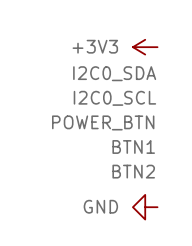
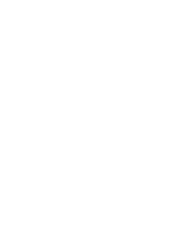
power symbol: +3V3 (145, 47) -> none
label: I2C0_SDA (114, 73) -> none
label: I2C0_SCL (114, 98) -> none
label: POWER_BTN (103, 122) -> none
label: BTN1 (133, 146) -> none
label: BTN2 (133, 171) -> none
power symbol: GND (145, 207) -> none

